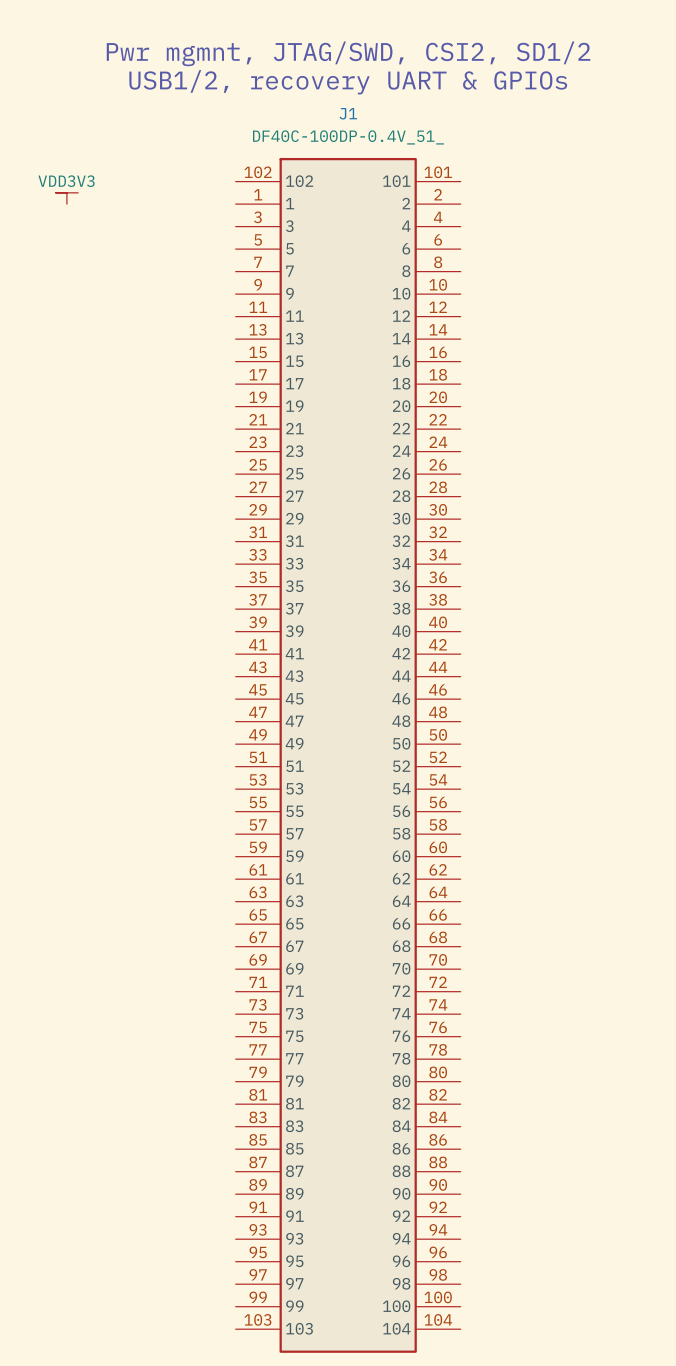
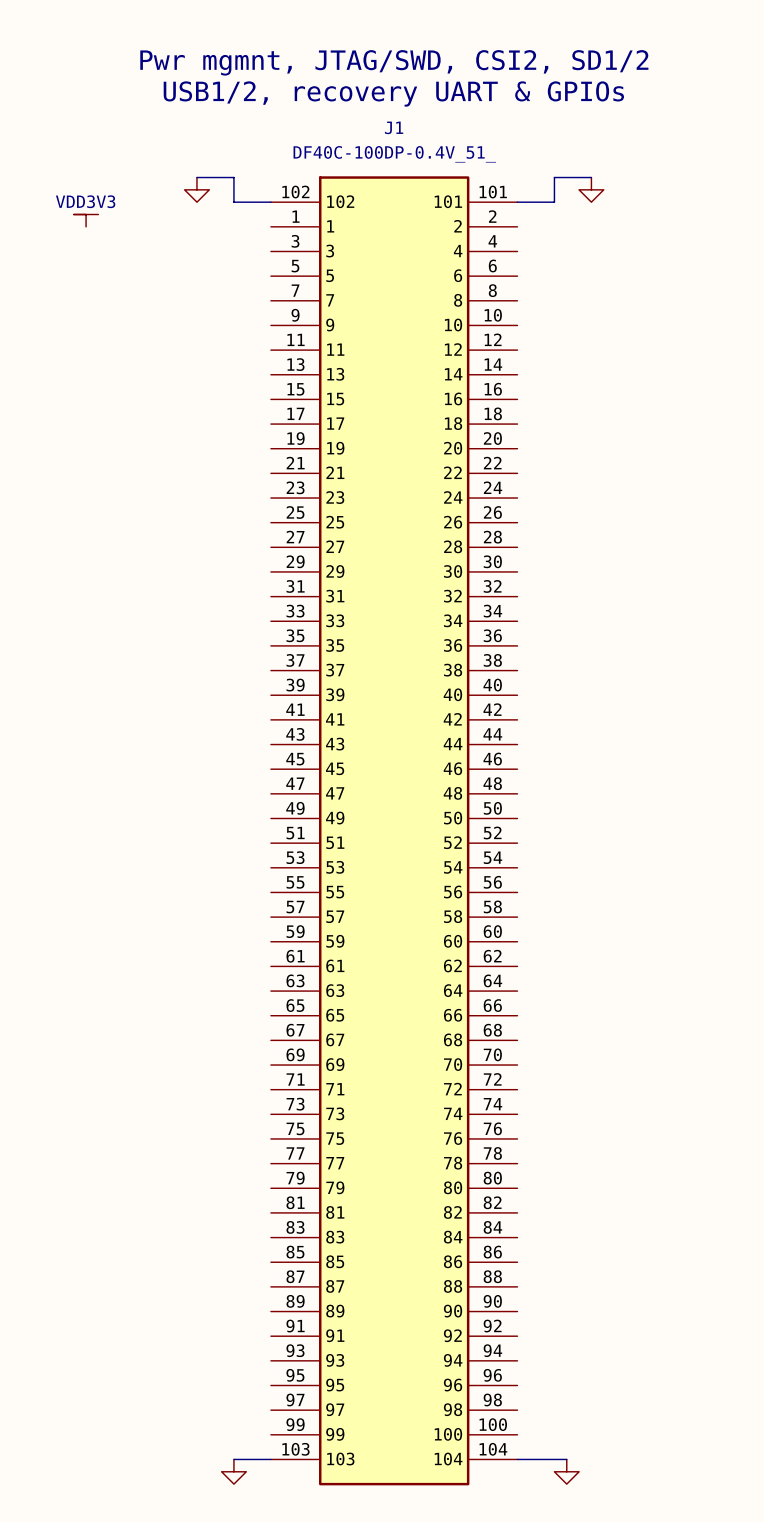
wire: none -> (196, 177) (233, 177) (233, 202) (270, 202)
wire: none -> (591, 177) (554, 177) (554, 202) (517, 202)
power symbol: none -> (196, 189)
power symbol: none -> (591, 189)
wire: none -> (233, 1459) (270, 1459)
wire: none -> (517, 1459) (566, 1459)
power symbol: none -> (233, 1471)
power symbol: none -> (566, 1471)

